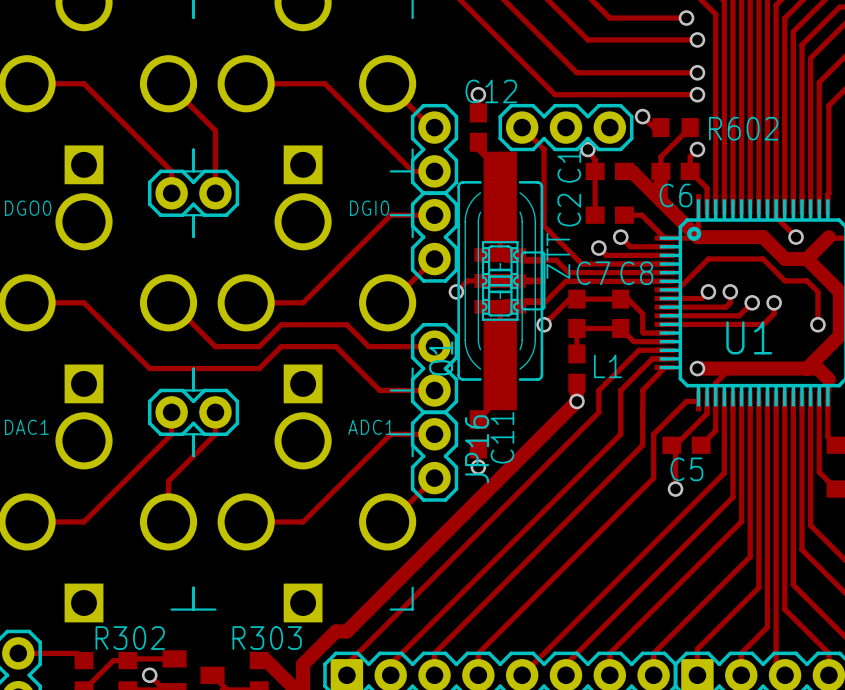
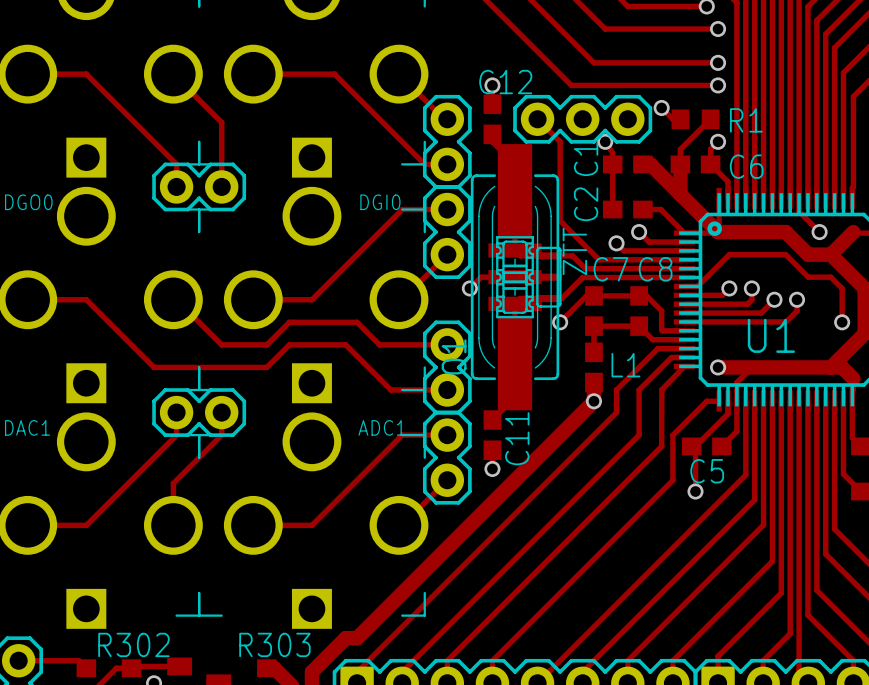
R602 name: R602 (743, 128) -> R1 (746, 120)
C6 name position: C6 (675, 195) -> C6 (746, 166)
JP16 name: JP16 (477, 449) -> none

